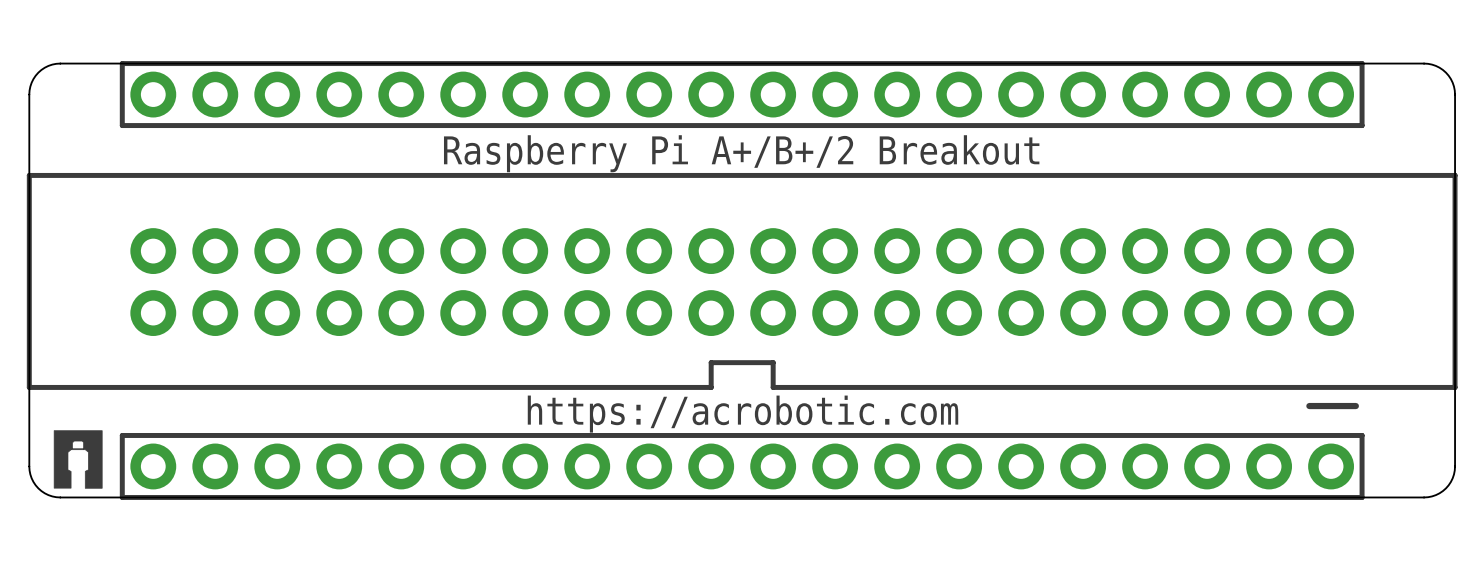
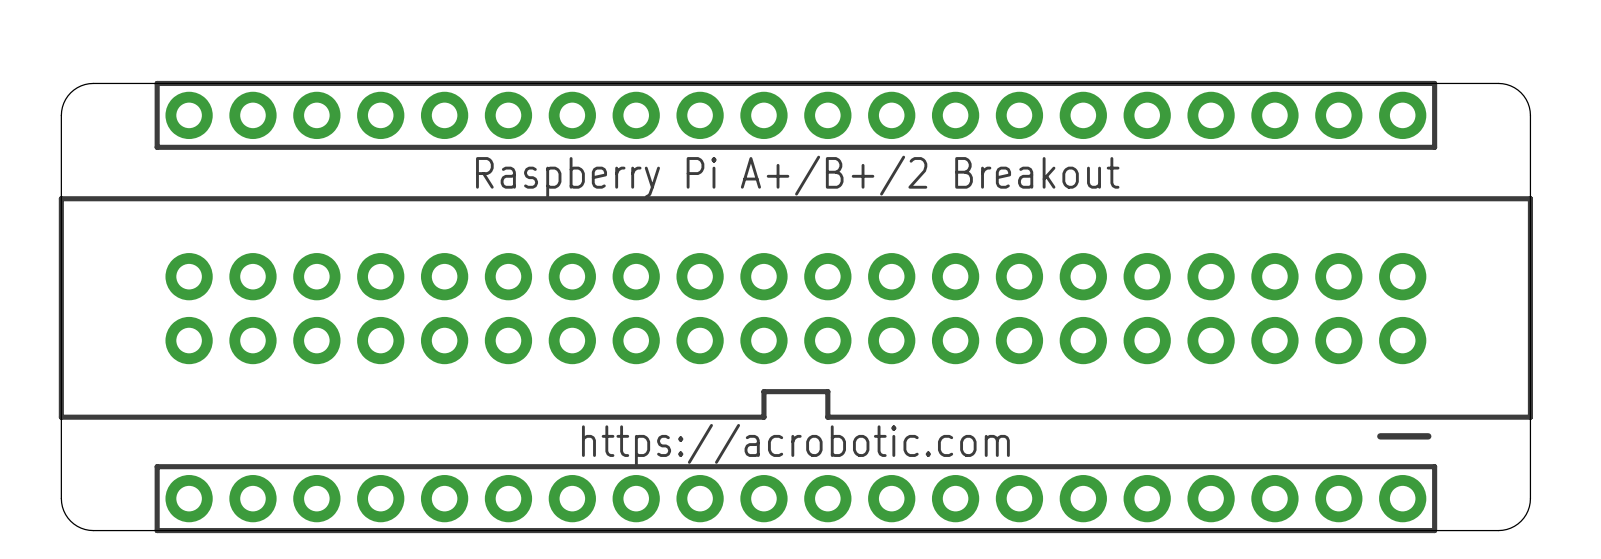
drawing: [53, 430, 103, 489] -> none

